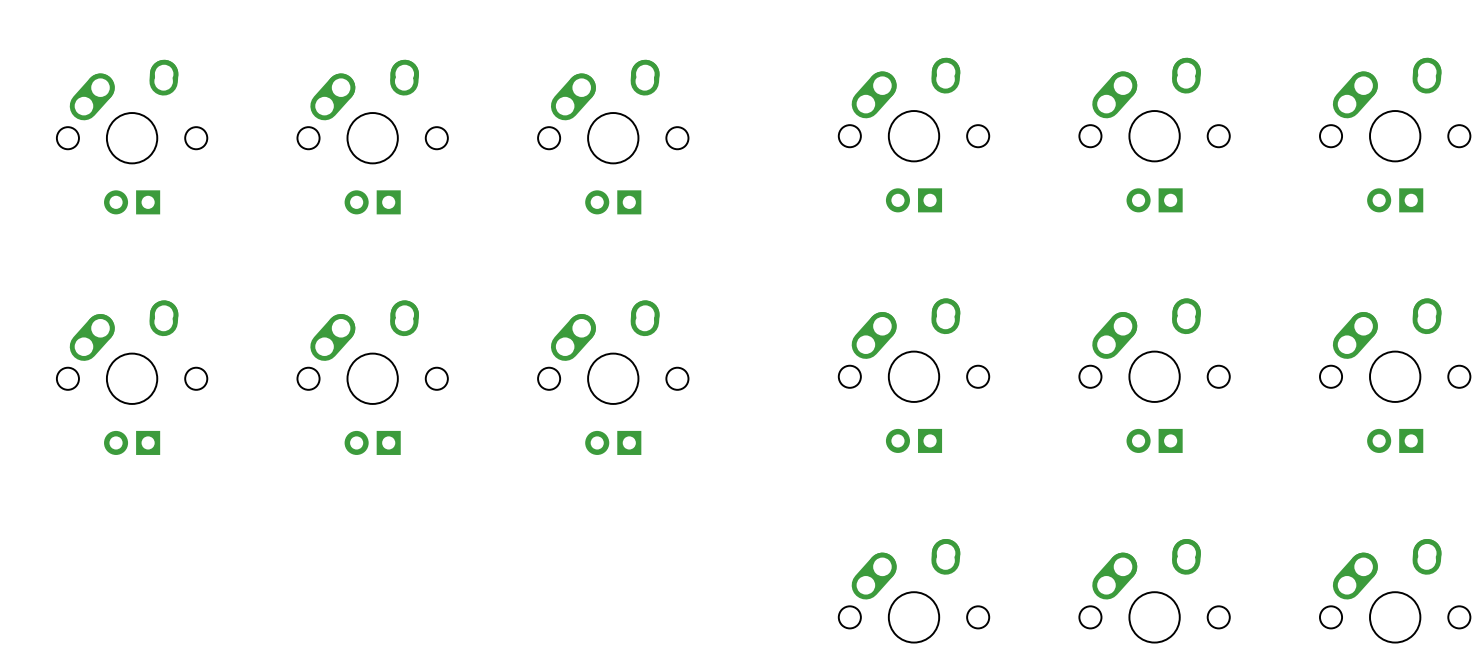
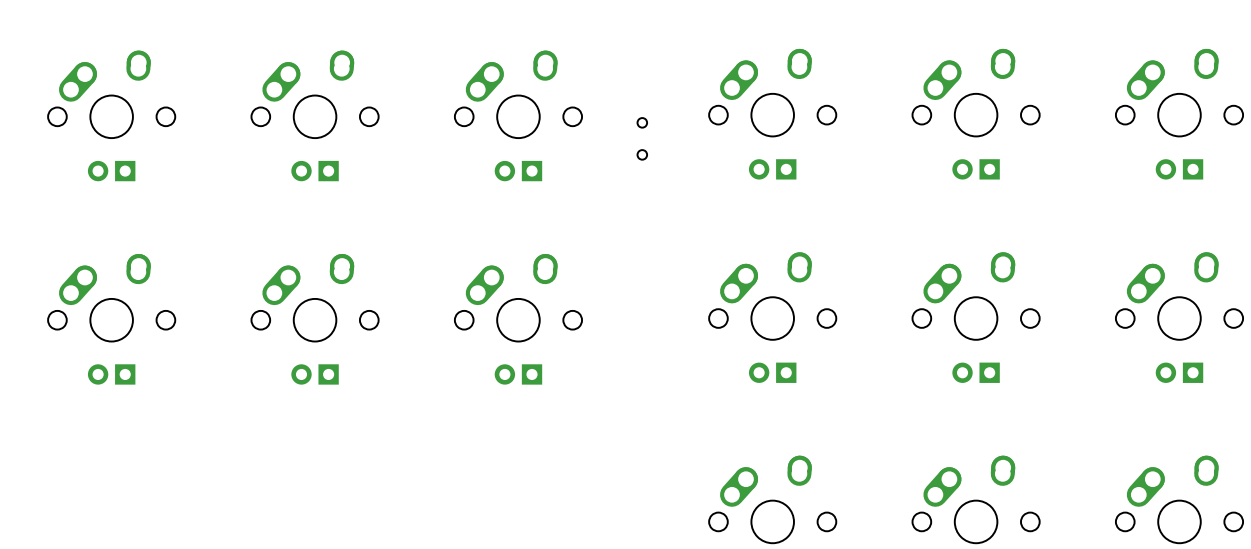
part: none -> (642, 138)

